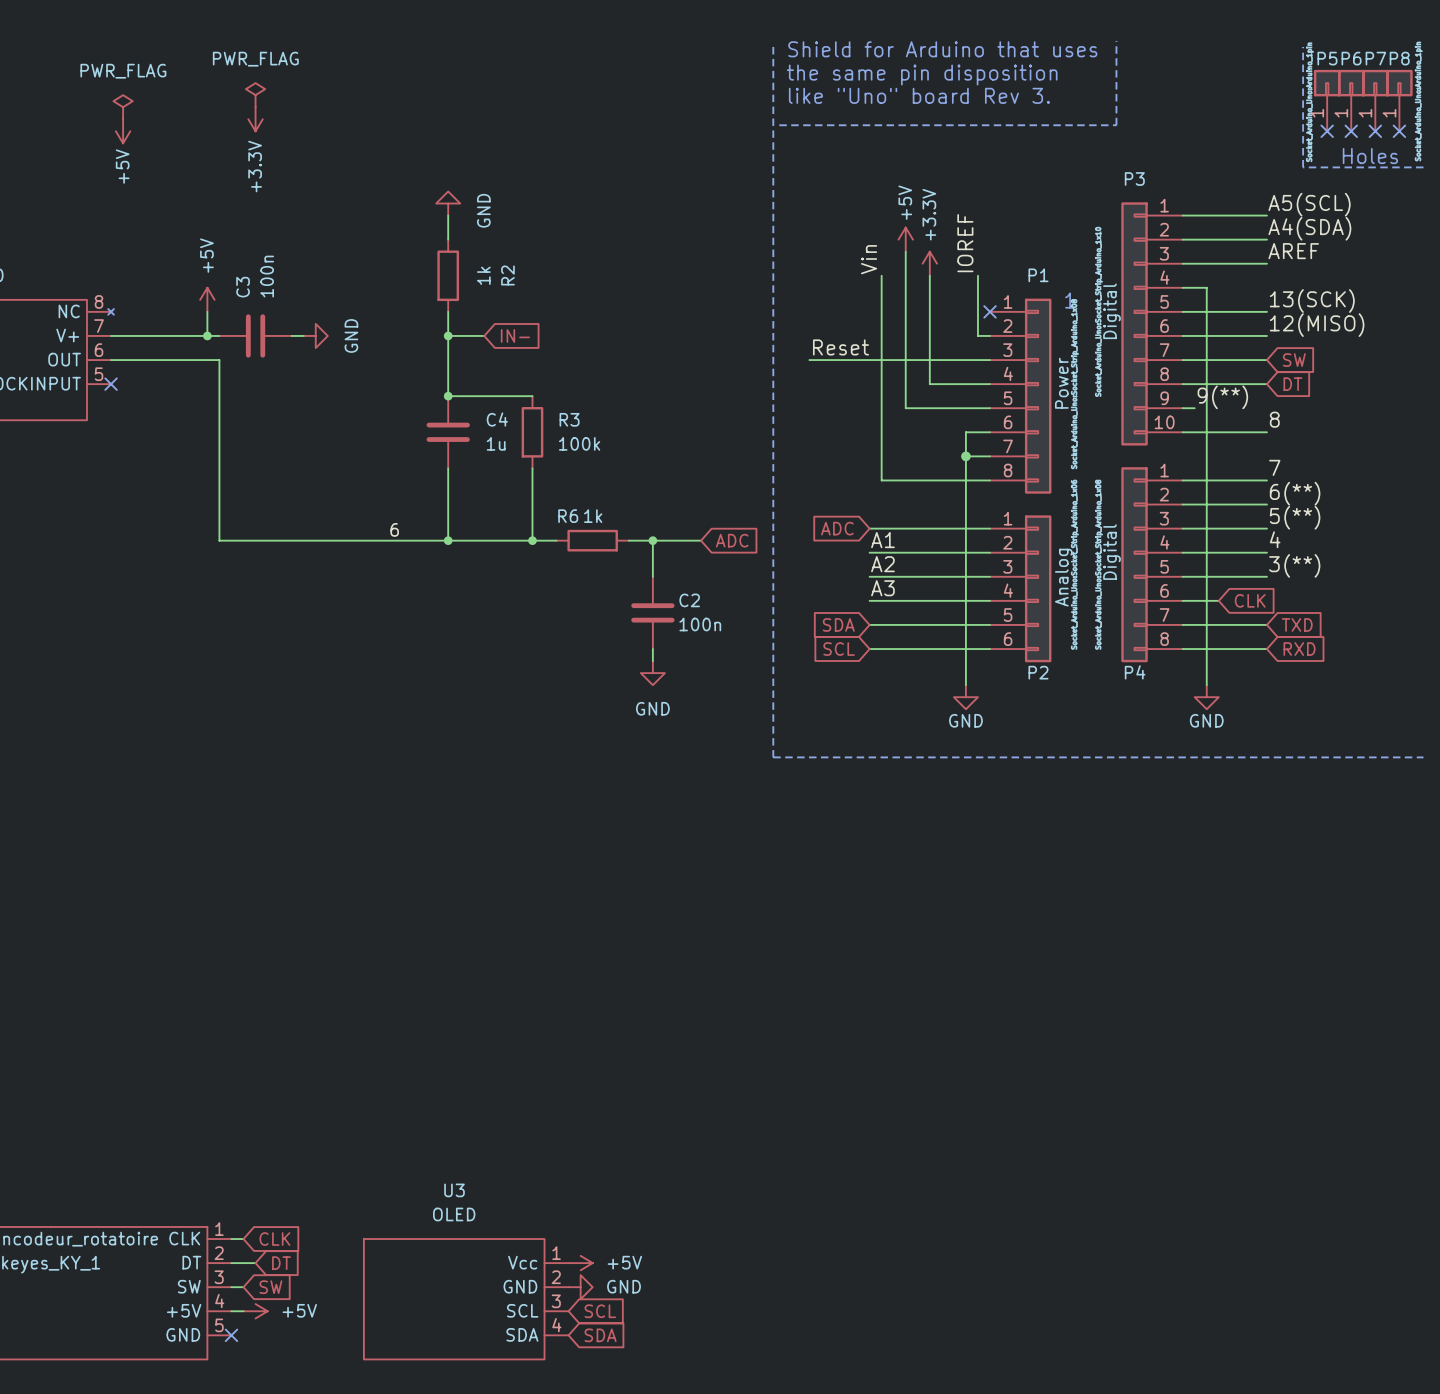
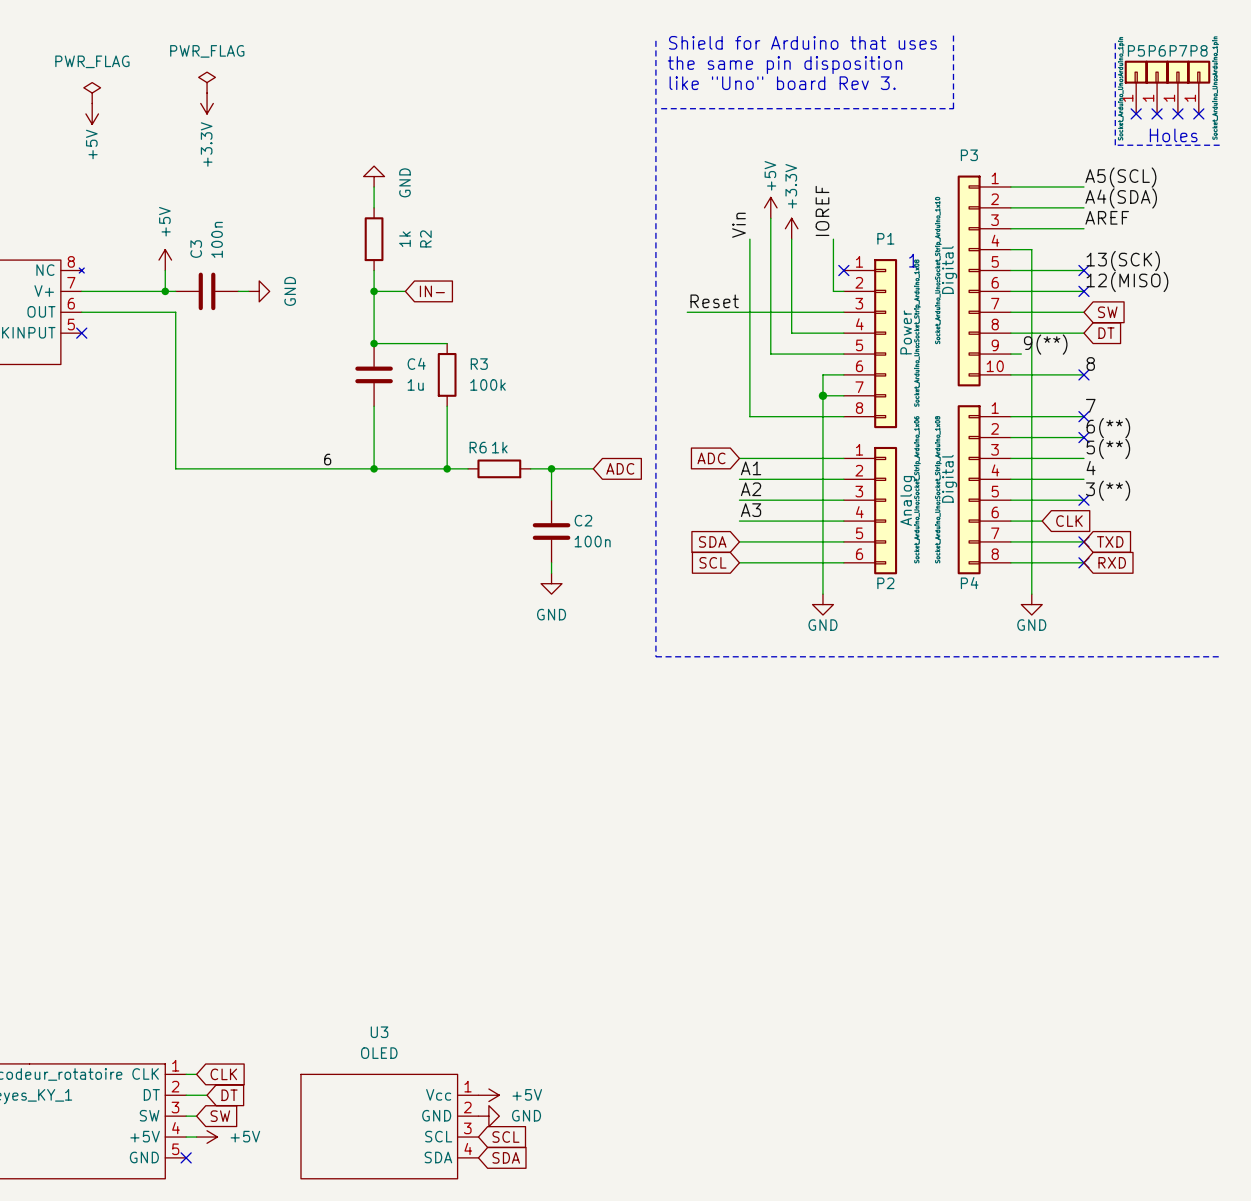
no-connect mark: none -> (1083, 270)
no-connect mark: none -> (1083, 291)
no-connect mark: none -> (1083, 374)
no-connect mark: none -> (1083, 416)
no-connect mark: none -> (1083, 437)
no-connect mark: none -> (1083, 500)
no-connect mark: none -> (1083, 541)
no-connect mark: none -> (1083, 562)

